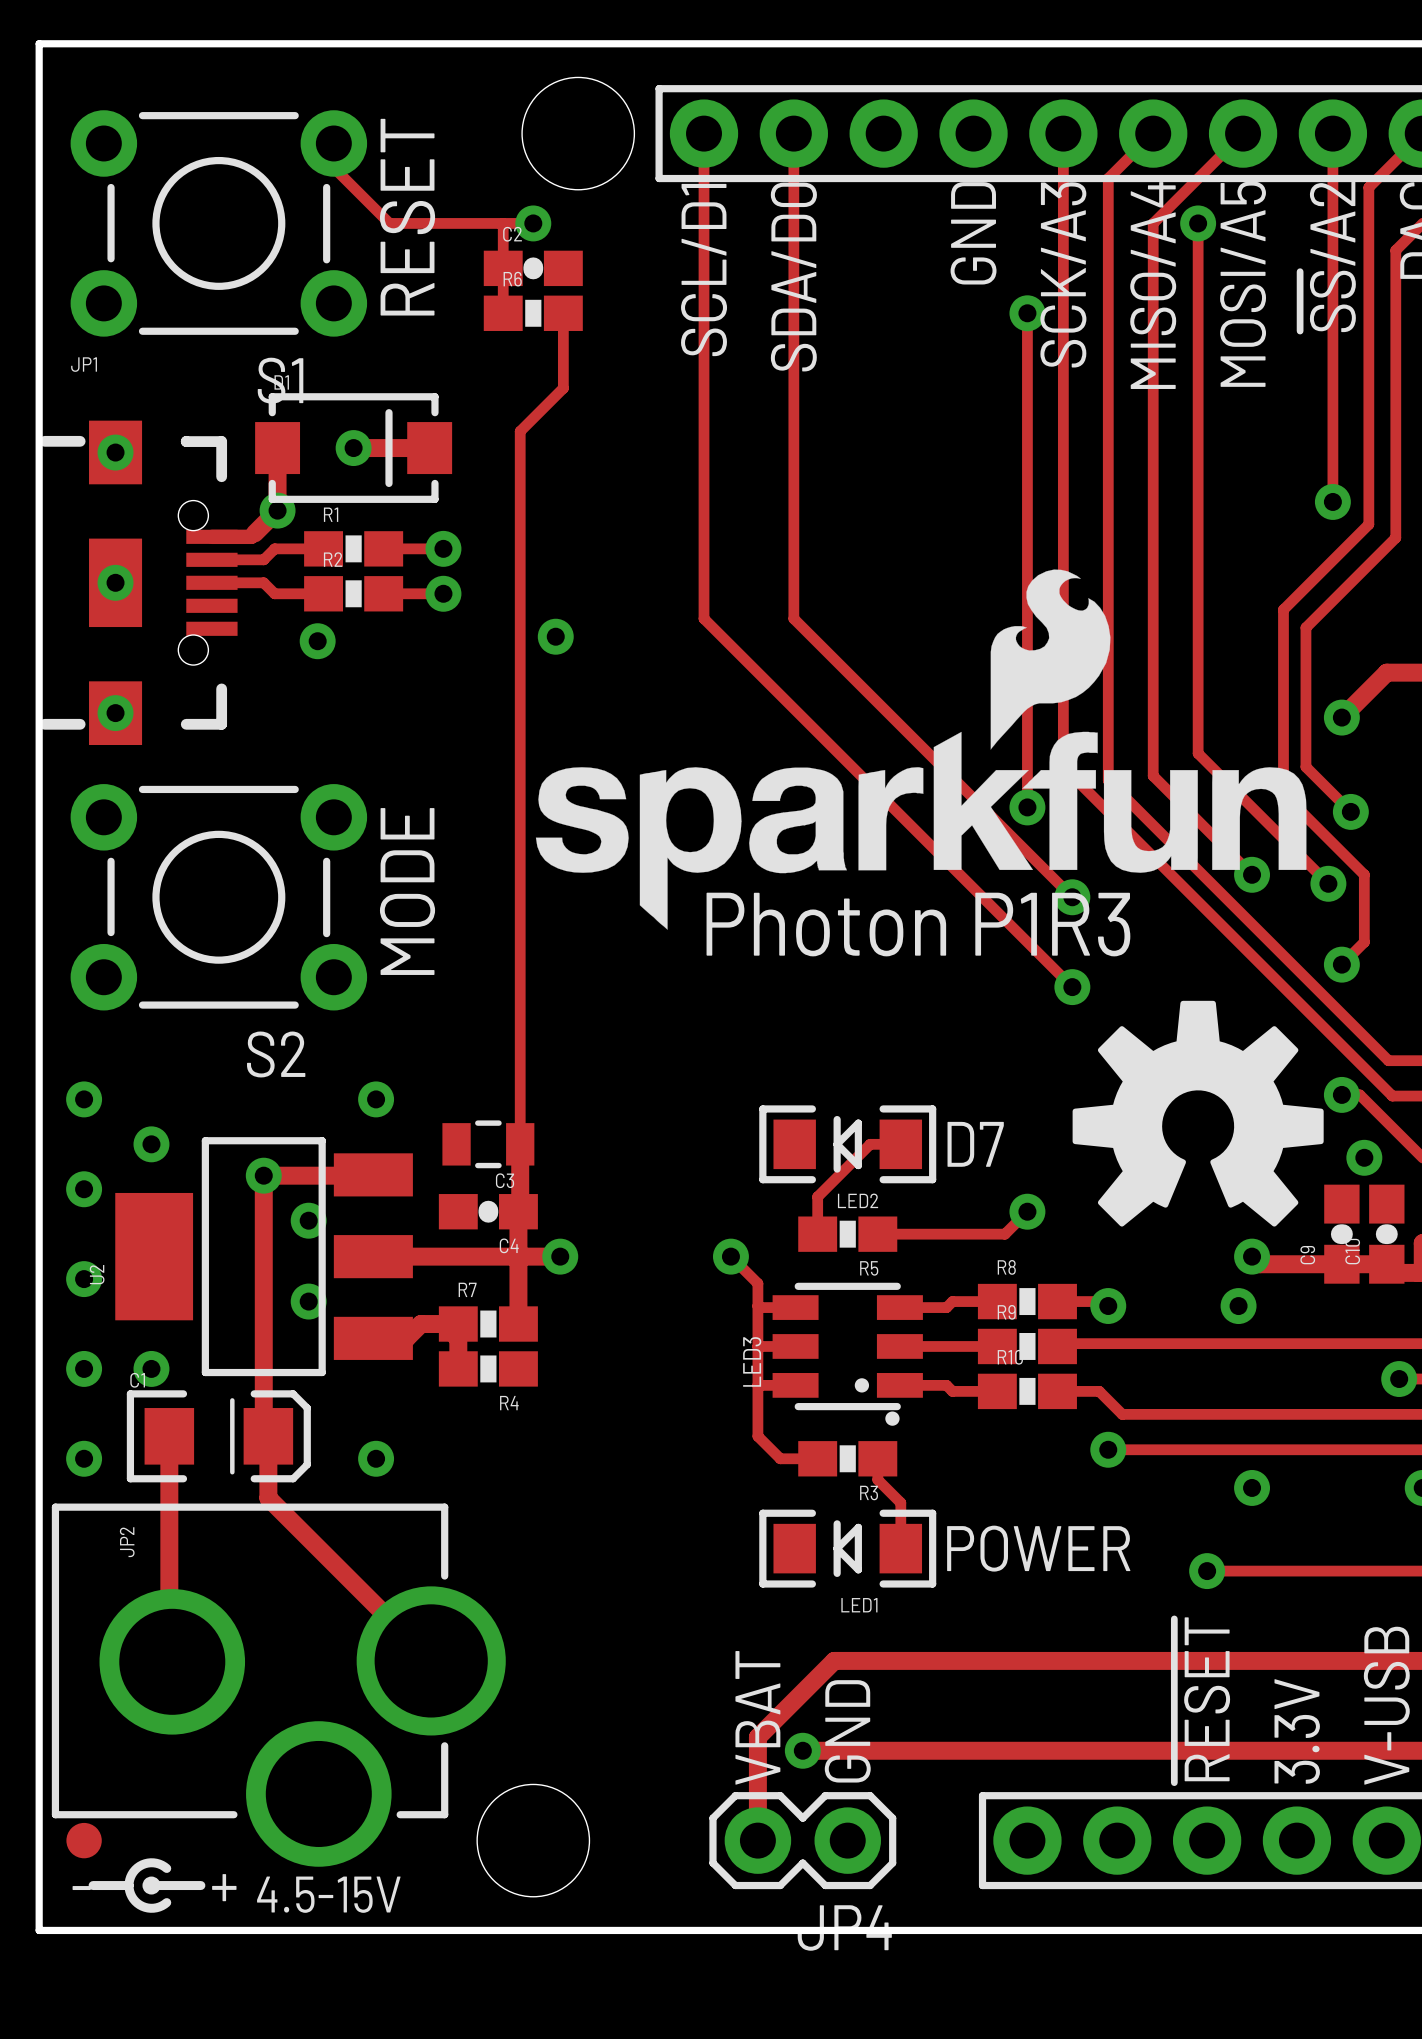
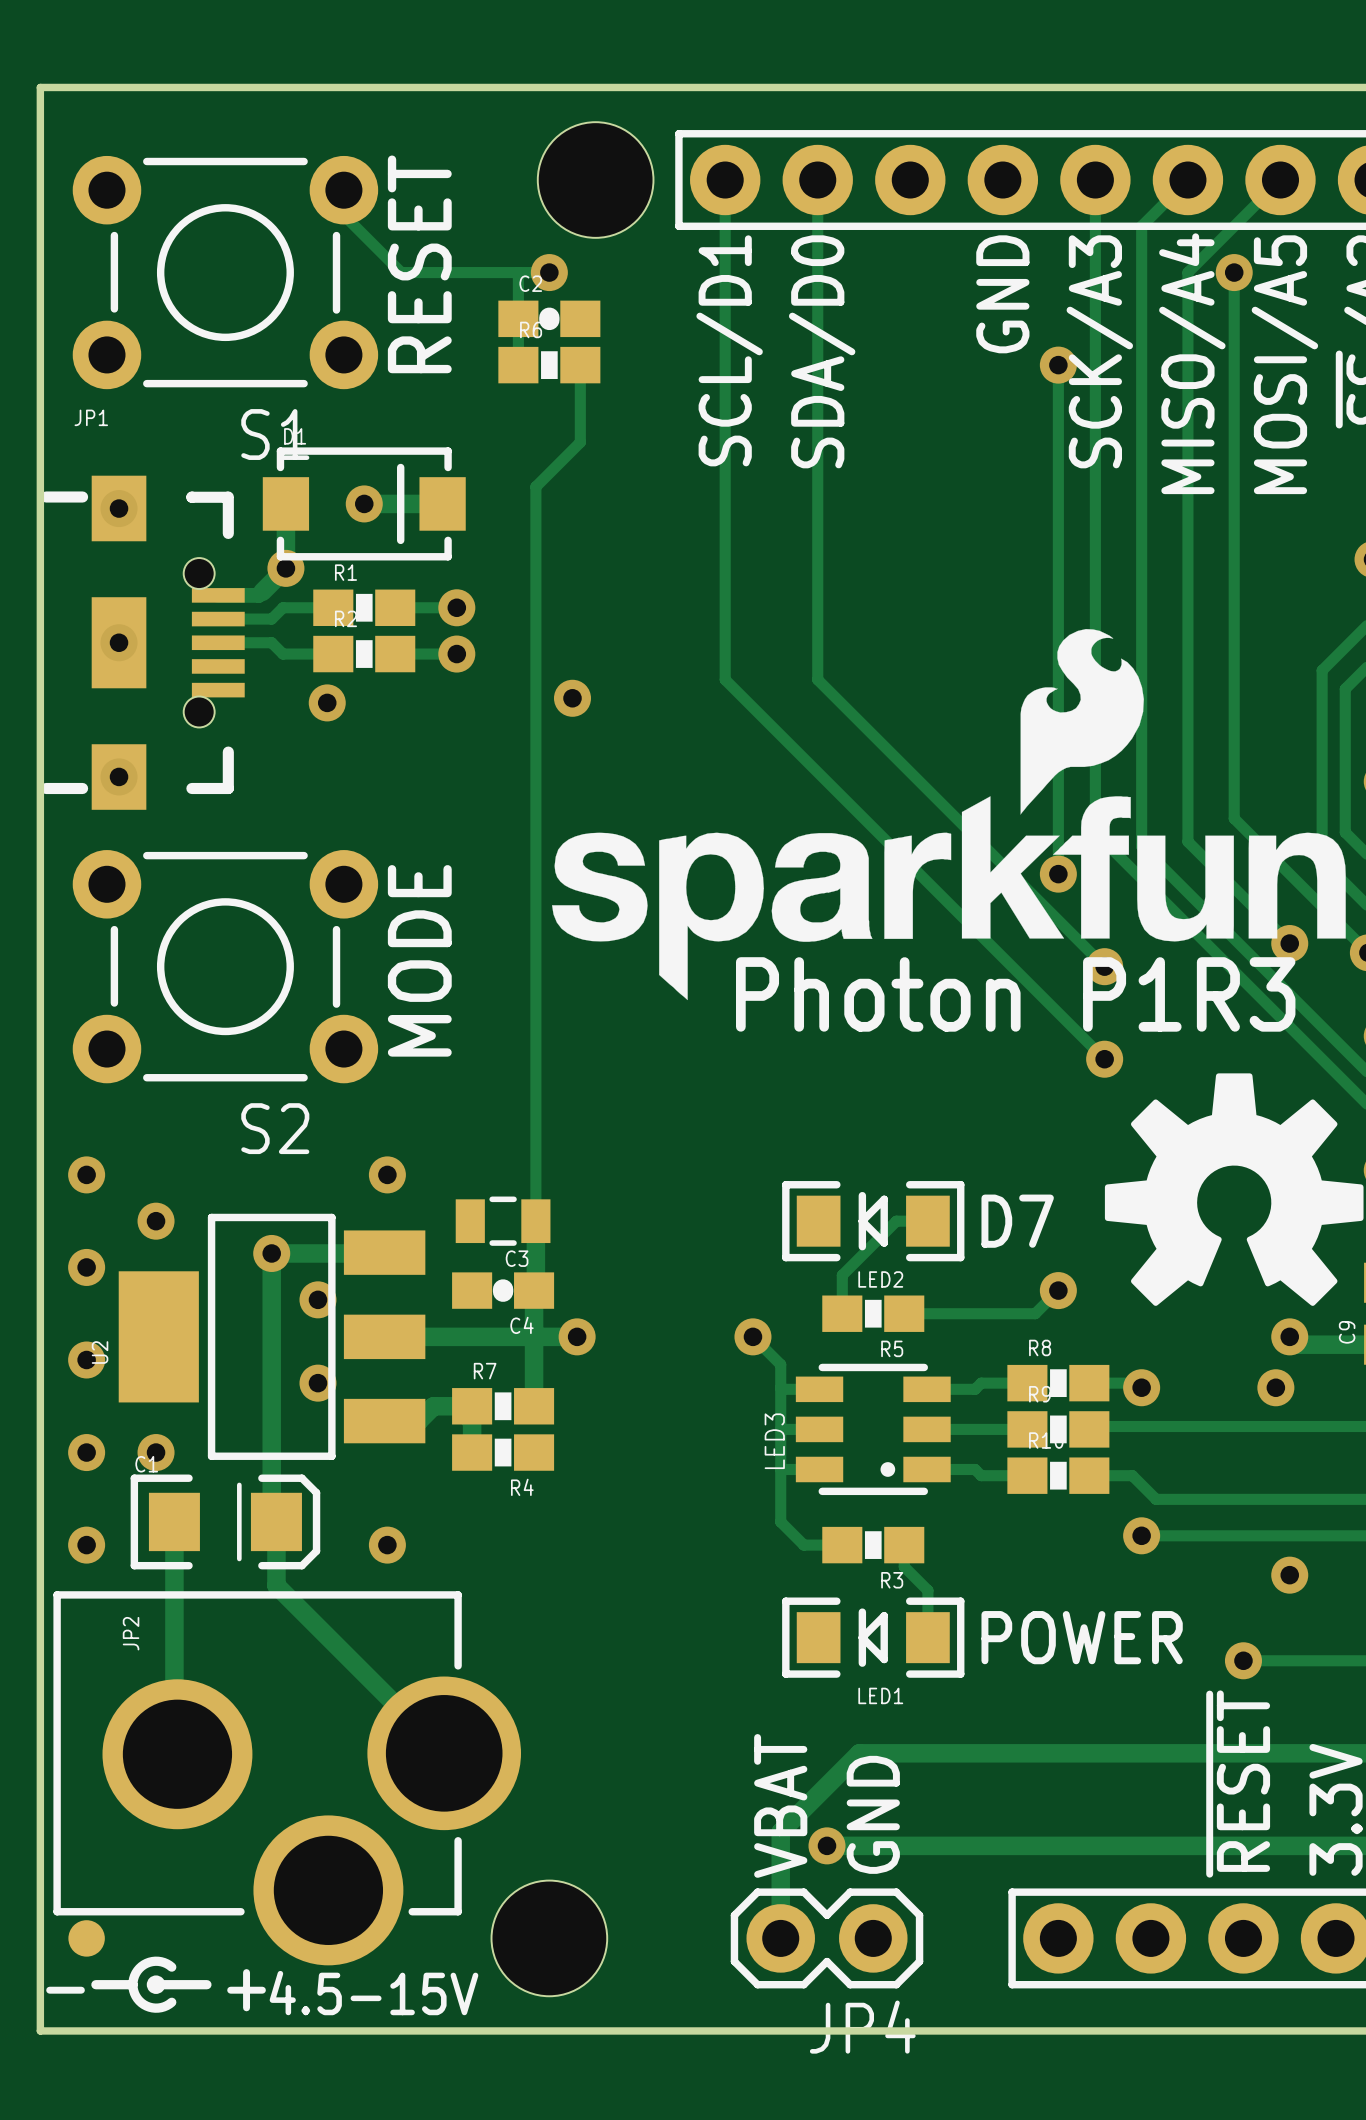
LED3 footprint: [772, 1282, 923, 1426] -> [795, 1363, 951, 1496]

